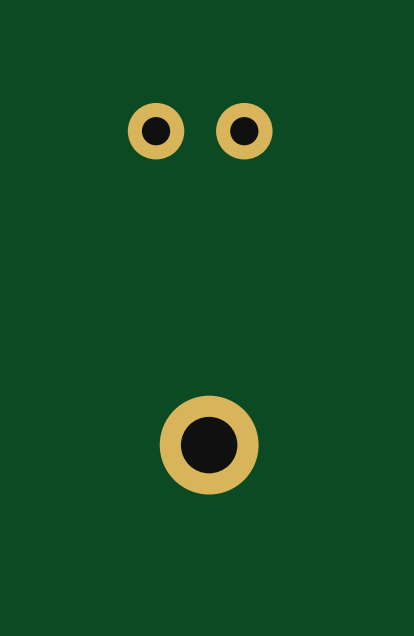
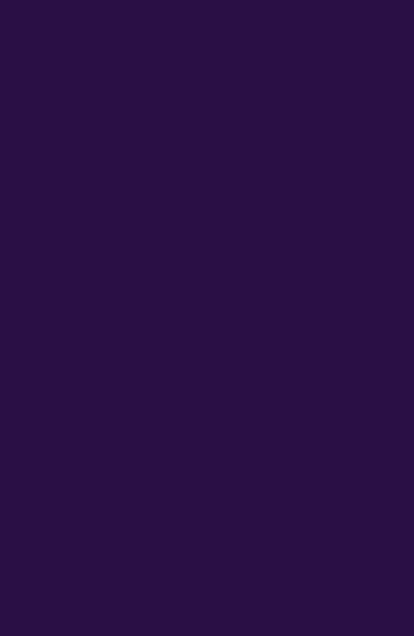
part: (200, 131) -> none
part: (209, 445) -> none

